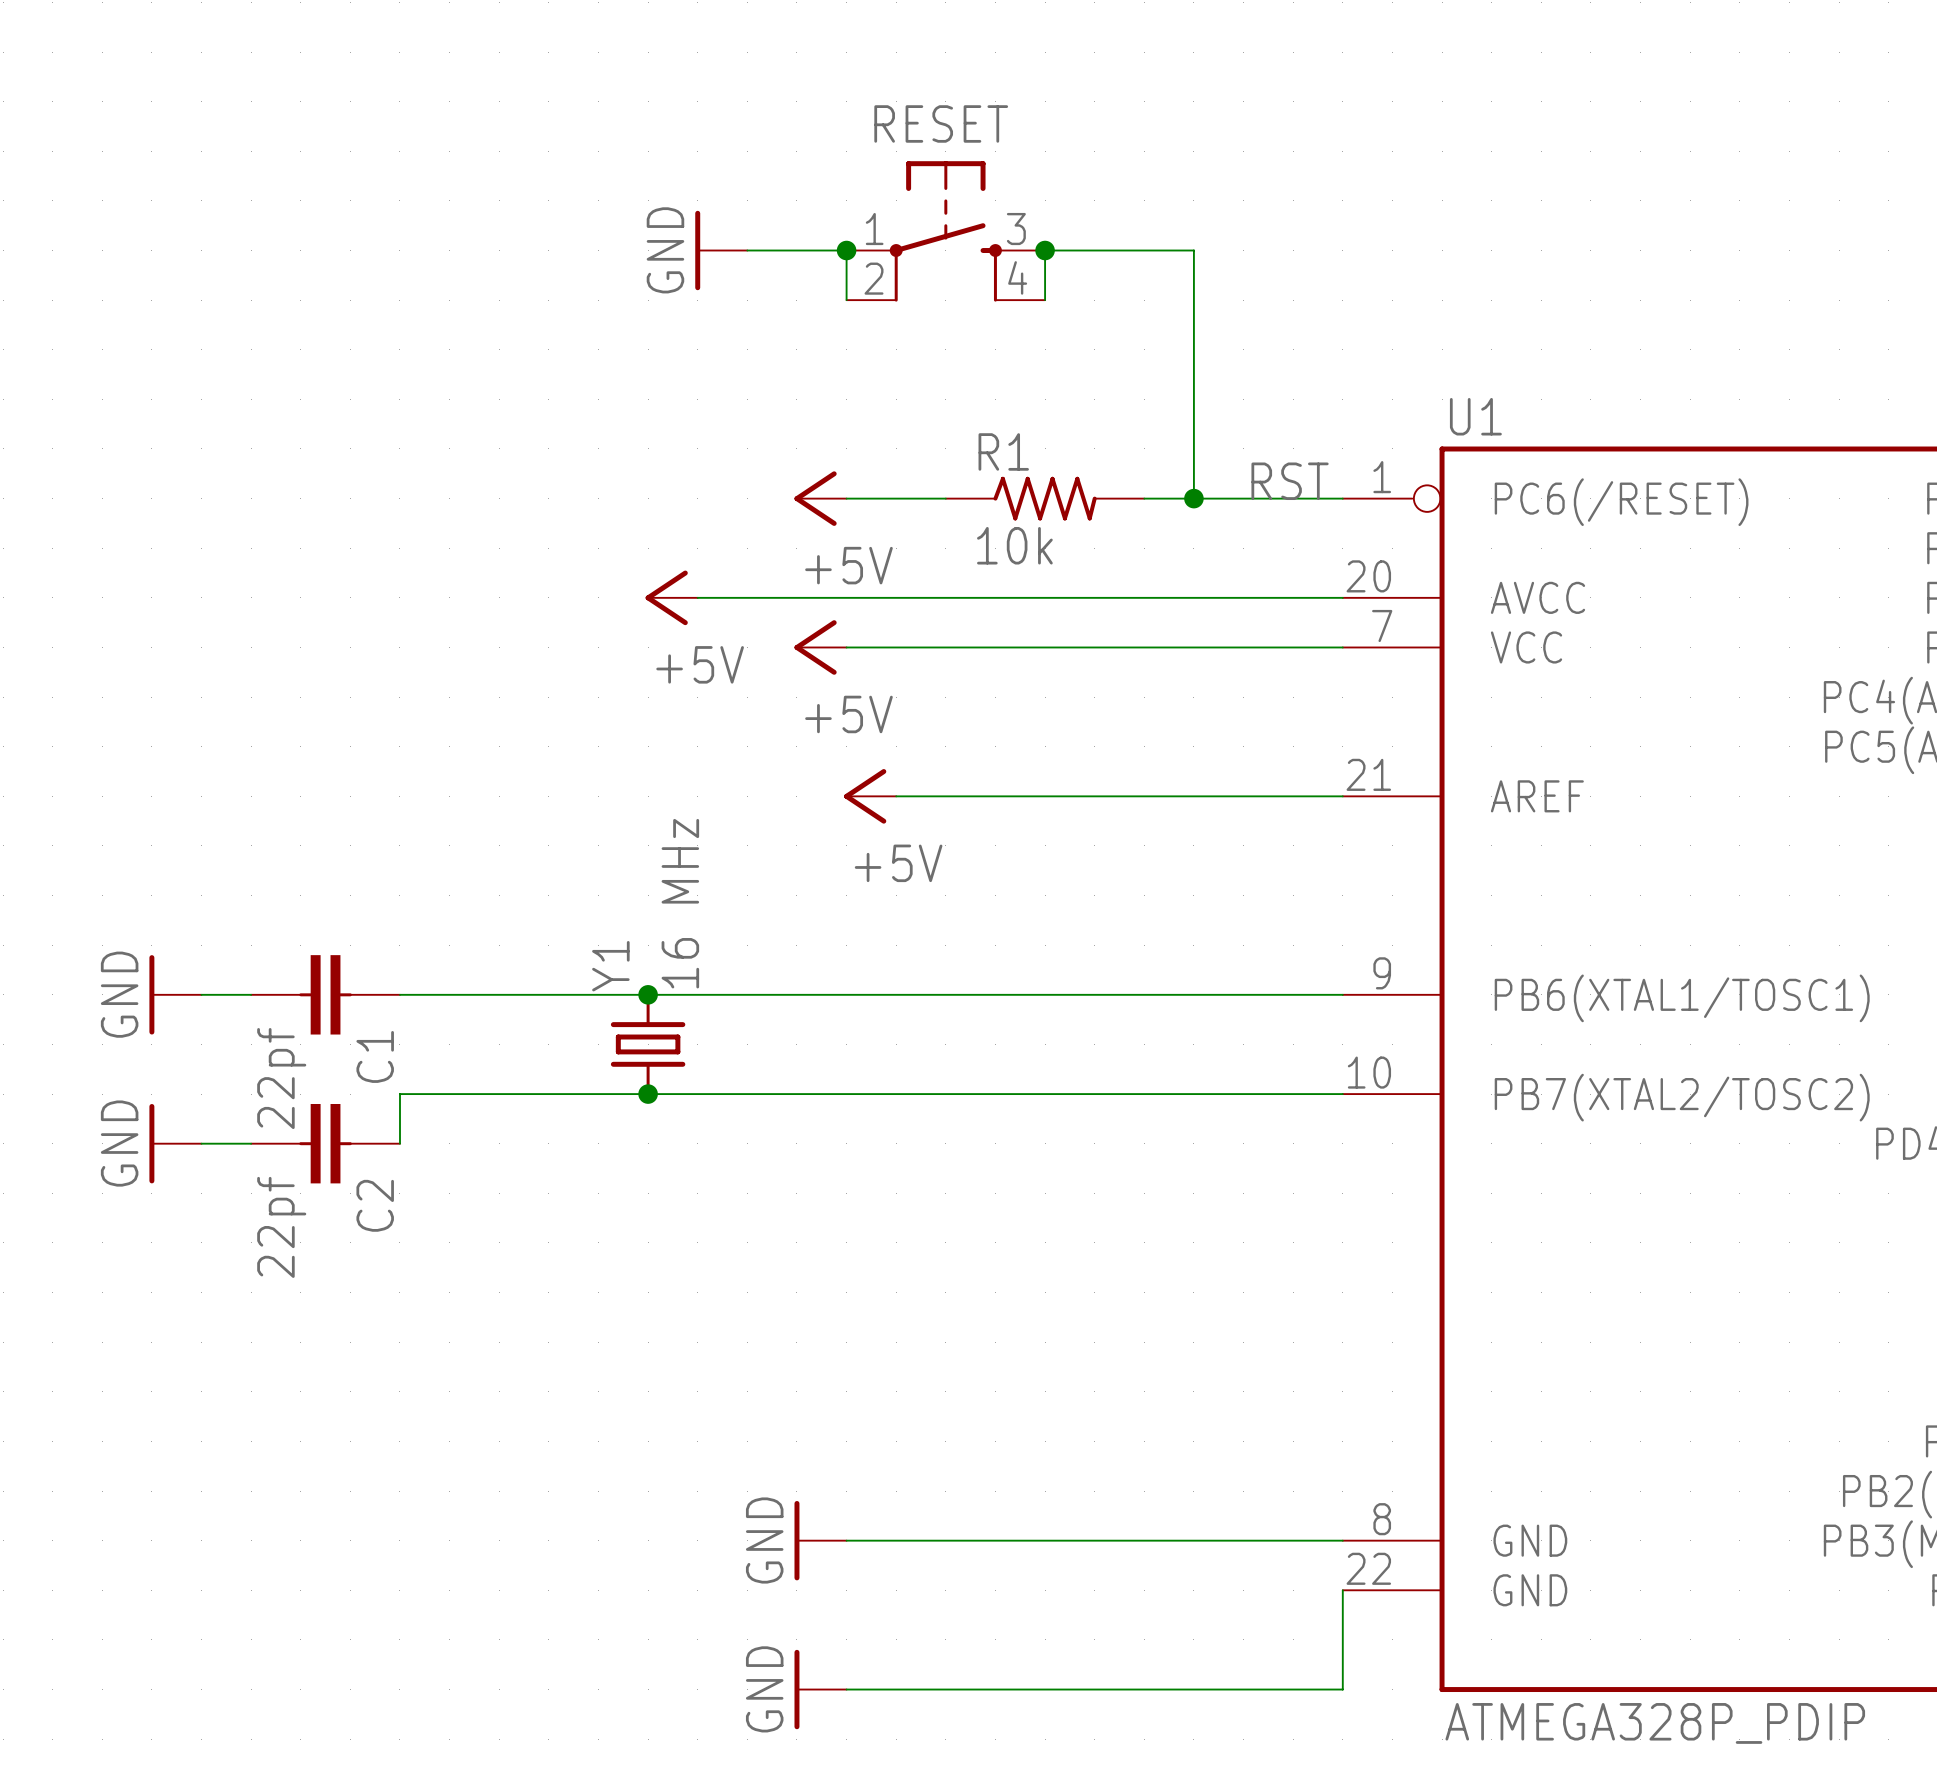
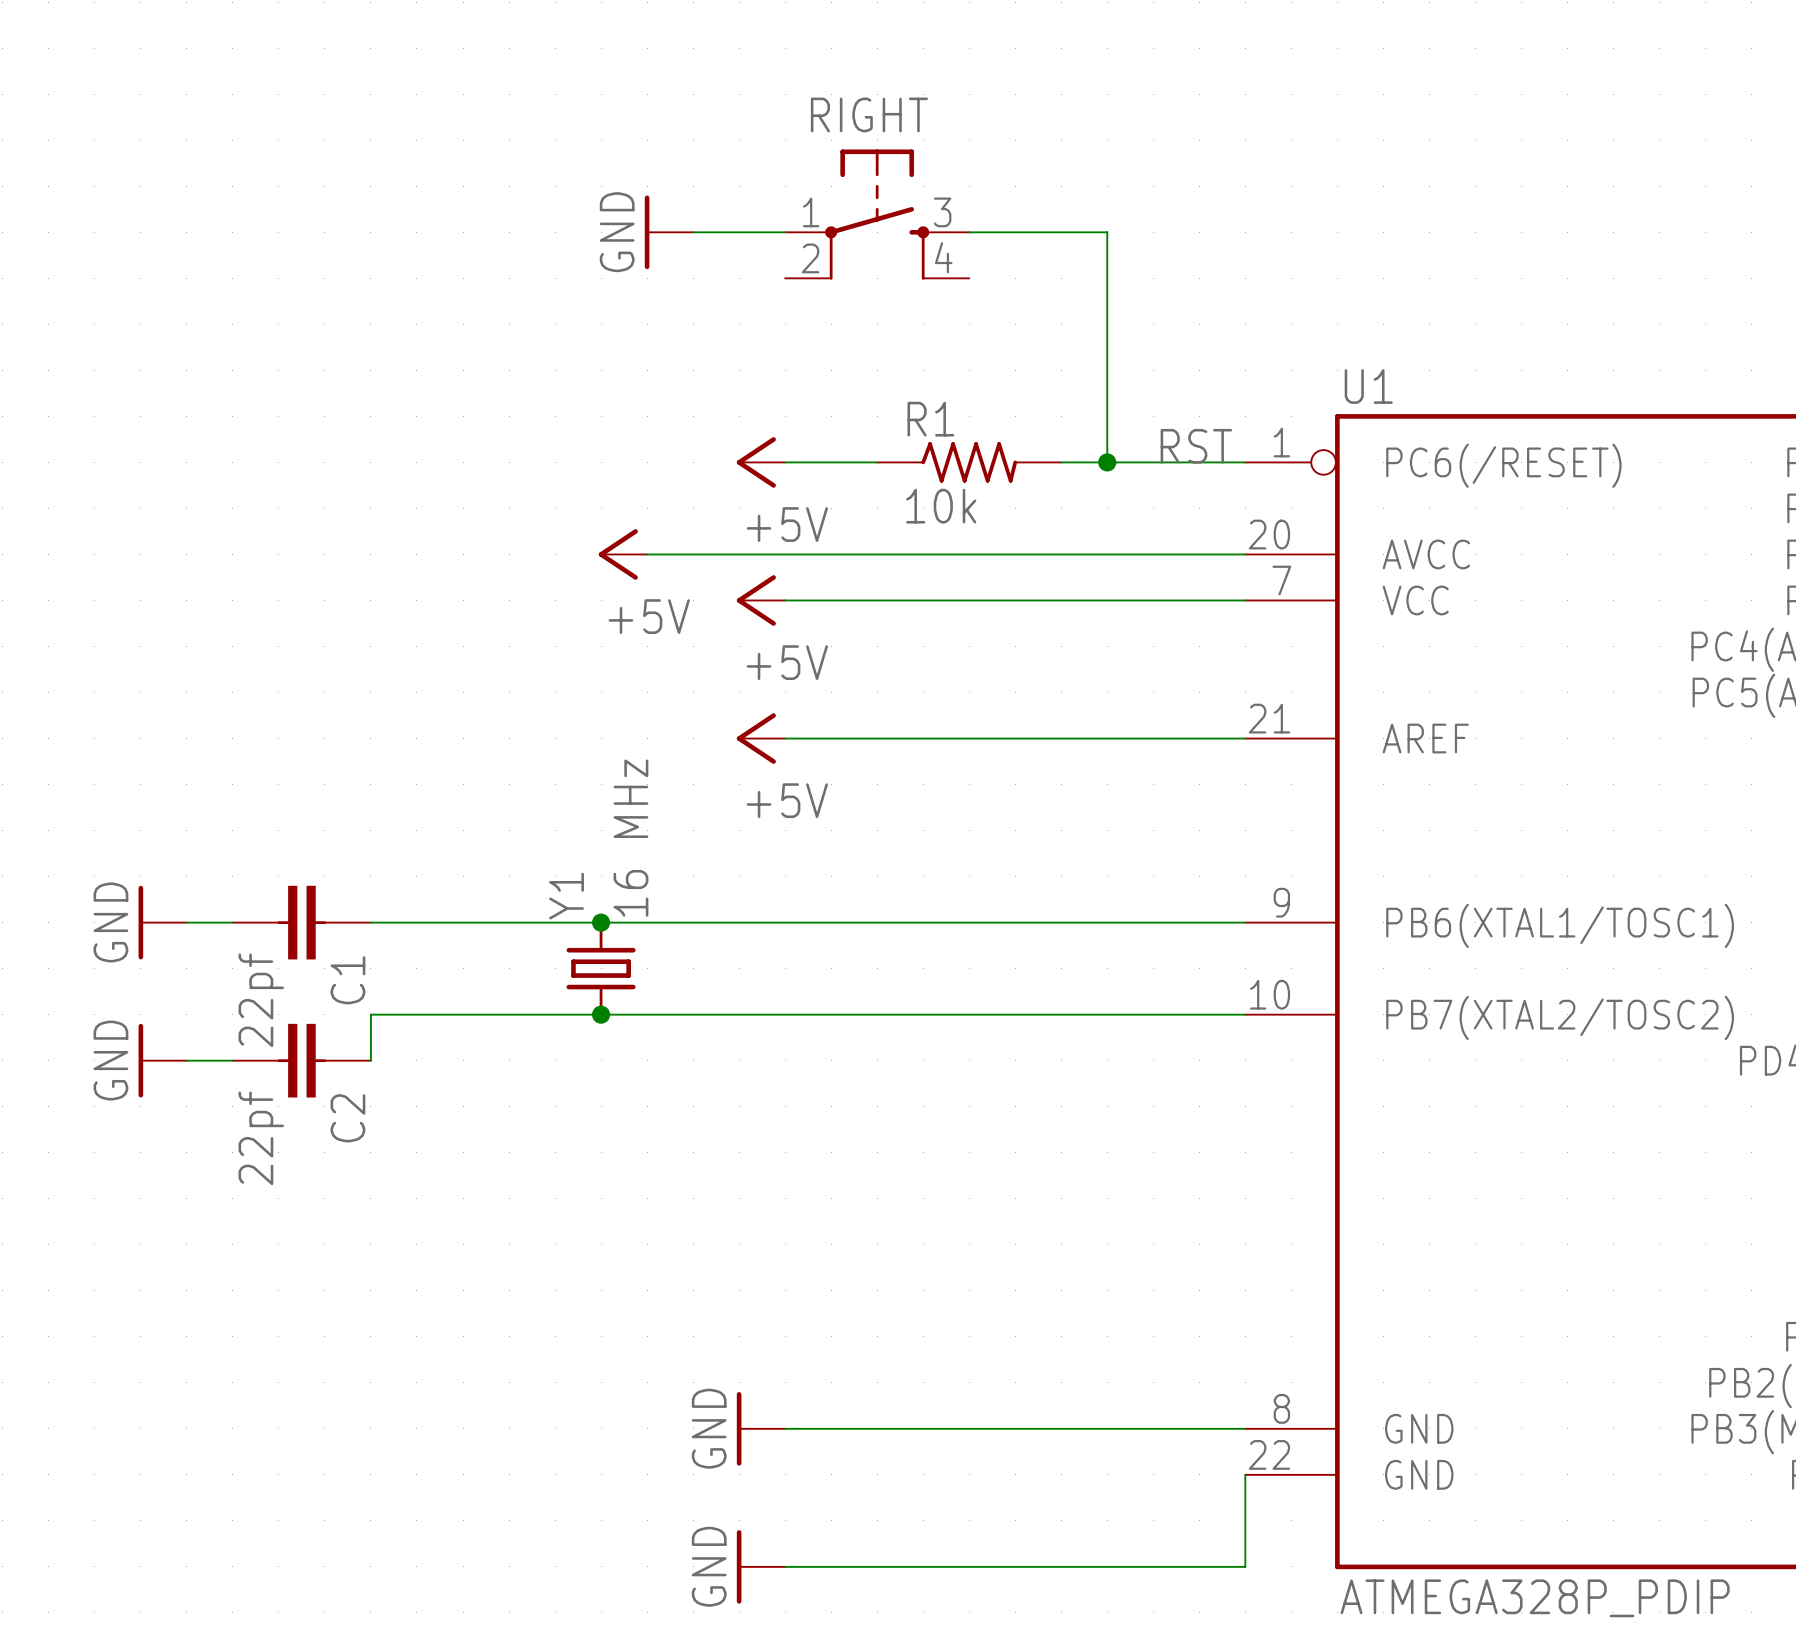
RESET name: RESET (941, 123) -> RIGHT (869, 114)
wire: (846, 250) (846, 300) -> none
junction: (846, 250) -> none
wire: (1045, 250) (1045, 300) -> none
junction: (1045, 250) -> none
power symbol position: +5V (870, 796) -> +5V (760, 738)

